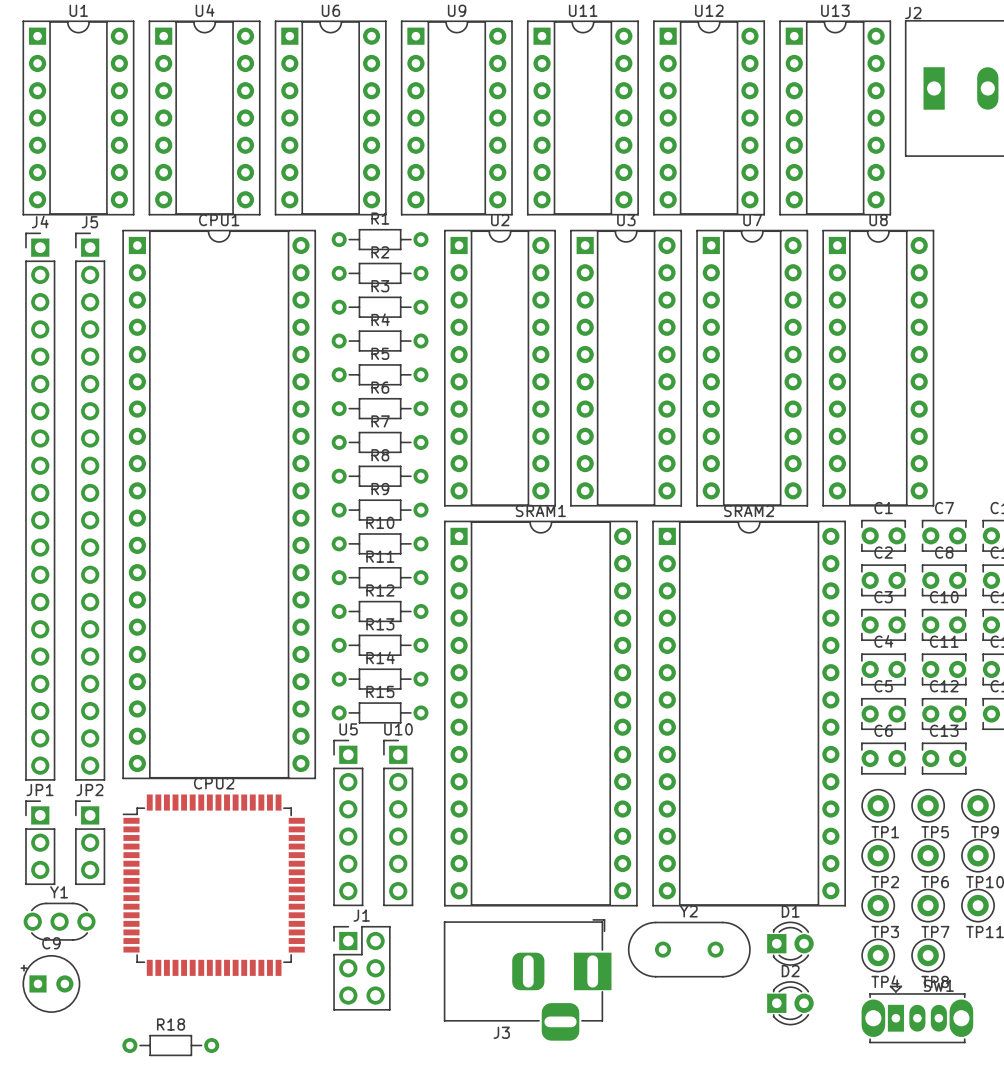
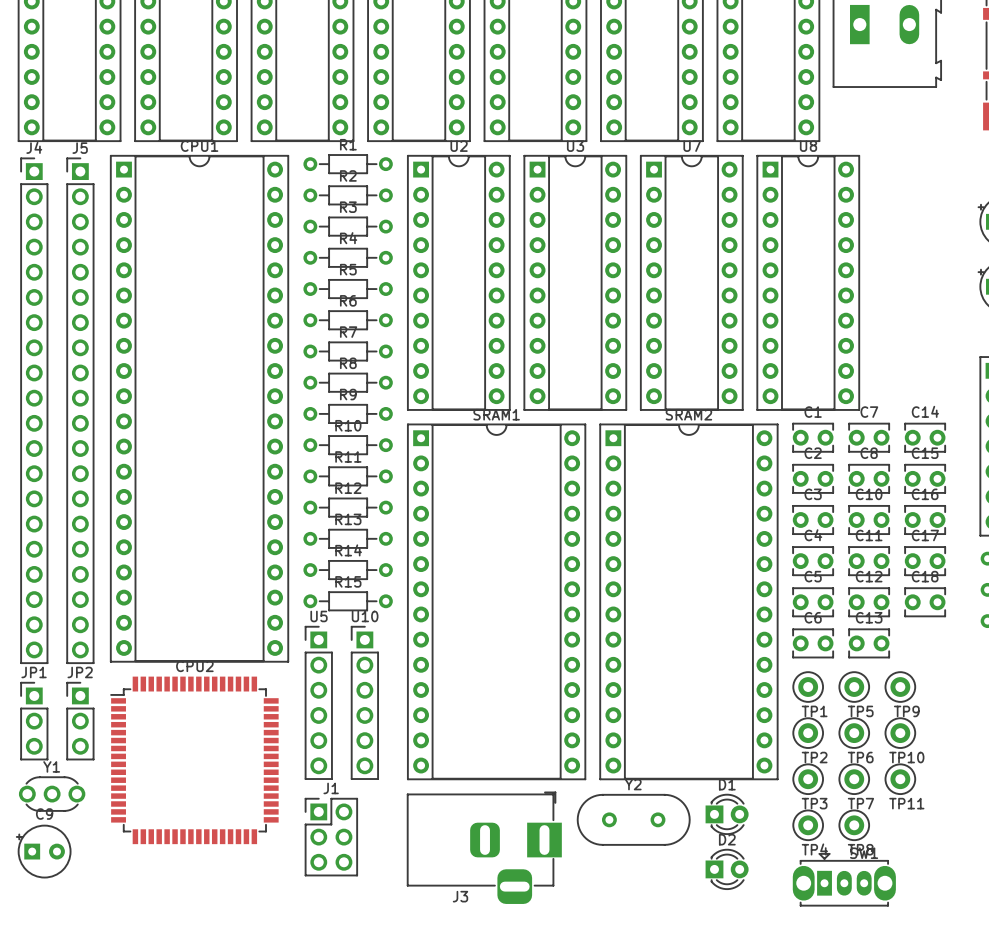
R18: (170, 1045) -> none

